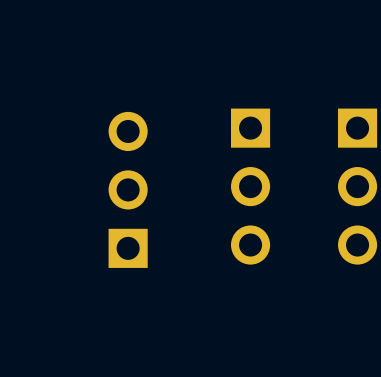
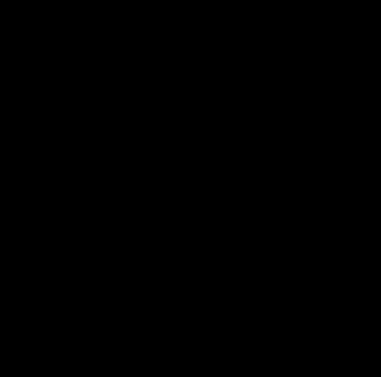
part: (250, 186) -> none
part: (357, 186) -> none
part: (128, 189) -> none

